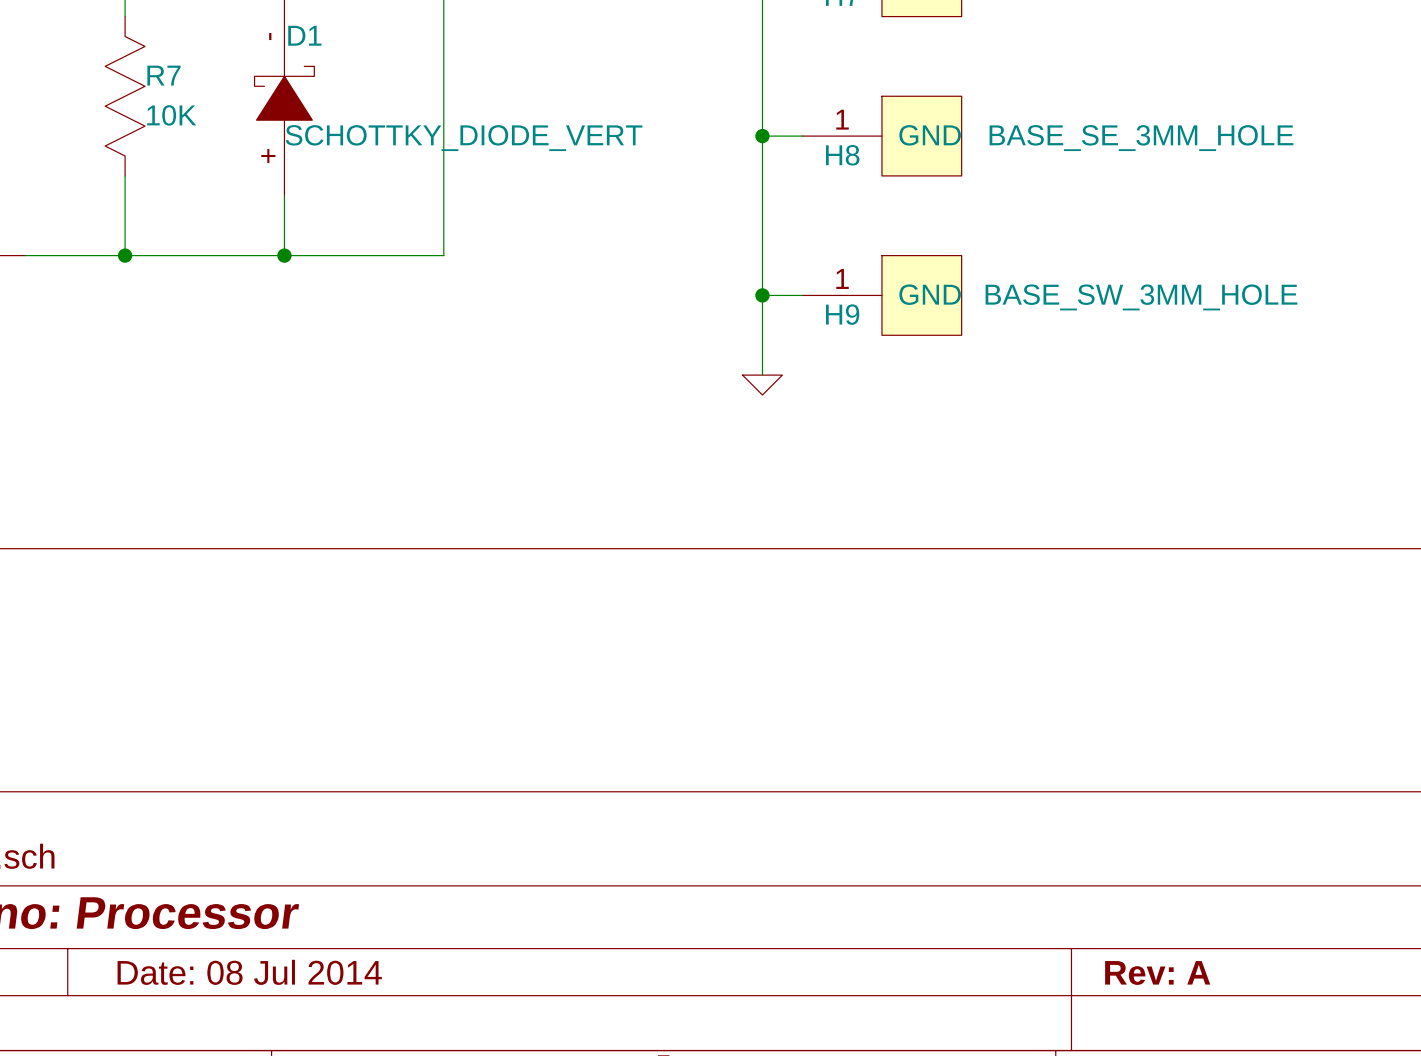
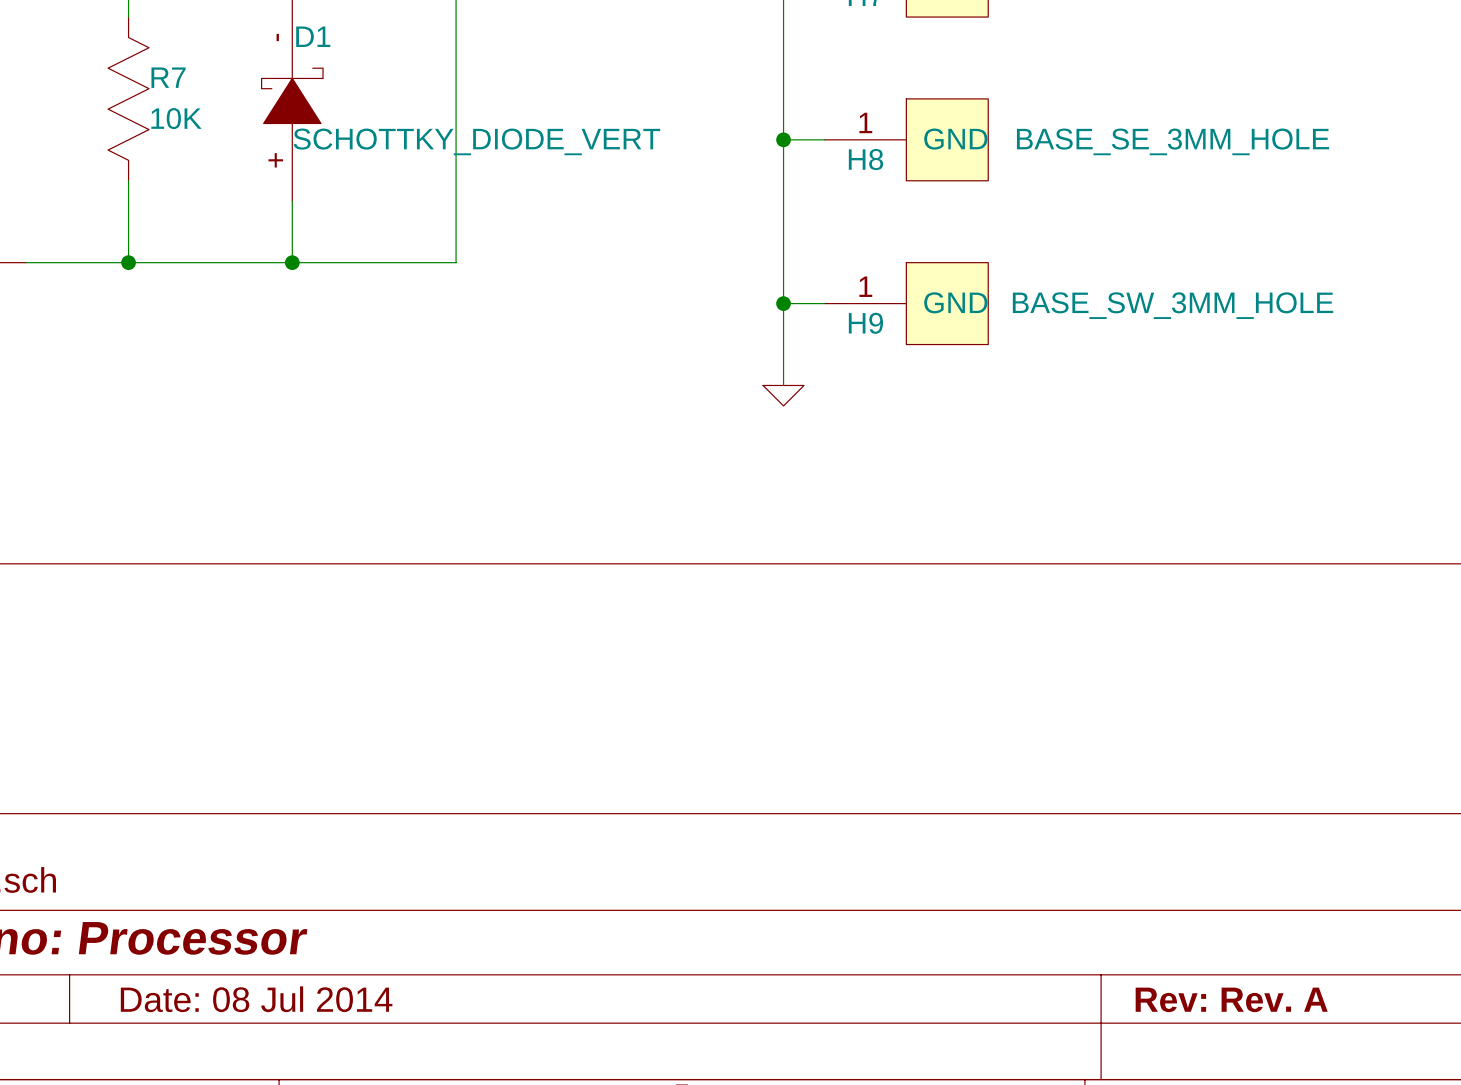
title block: Rev: A (1157, 972) -> Rev: Rev. A (1231, 999)

